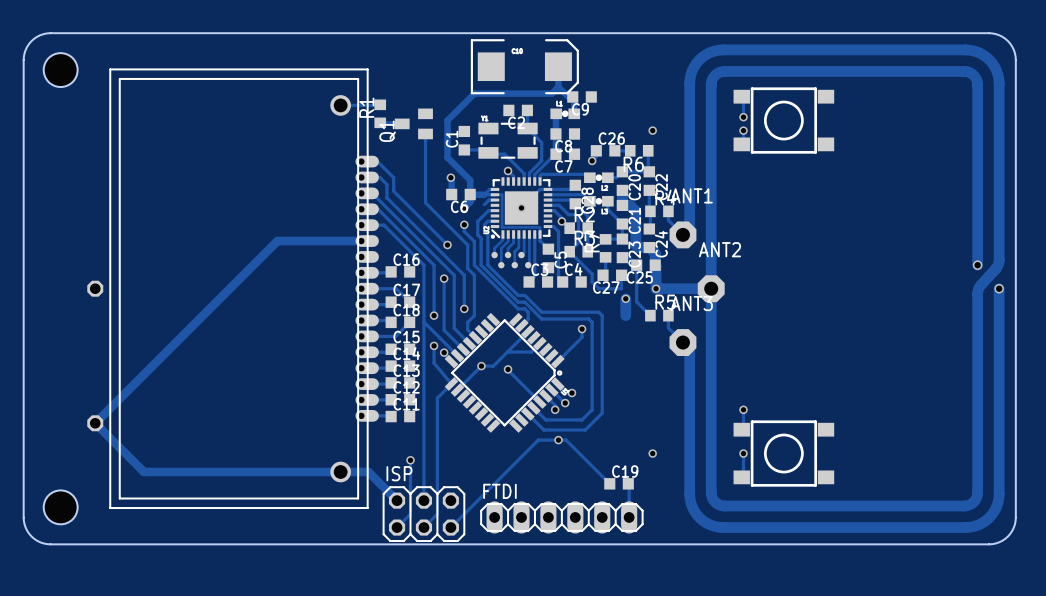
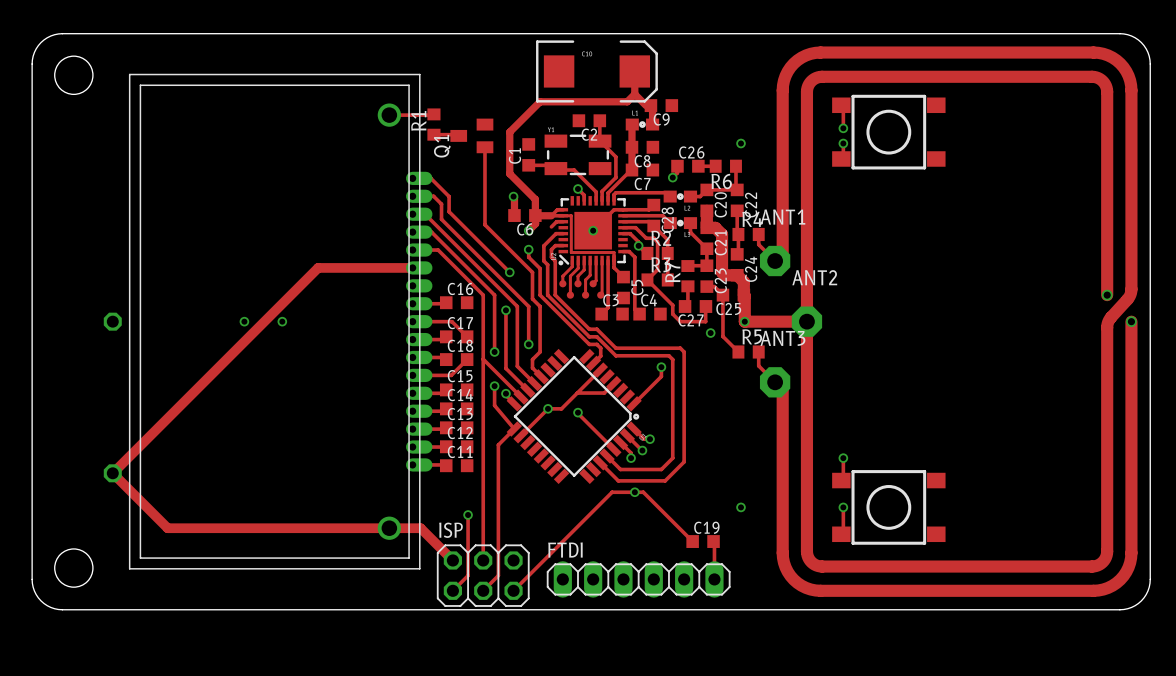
via: none -> (244, 321)
via: none -> (282, 321)
track: (625, 298) (625, 315) -> none

